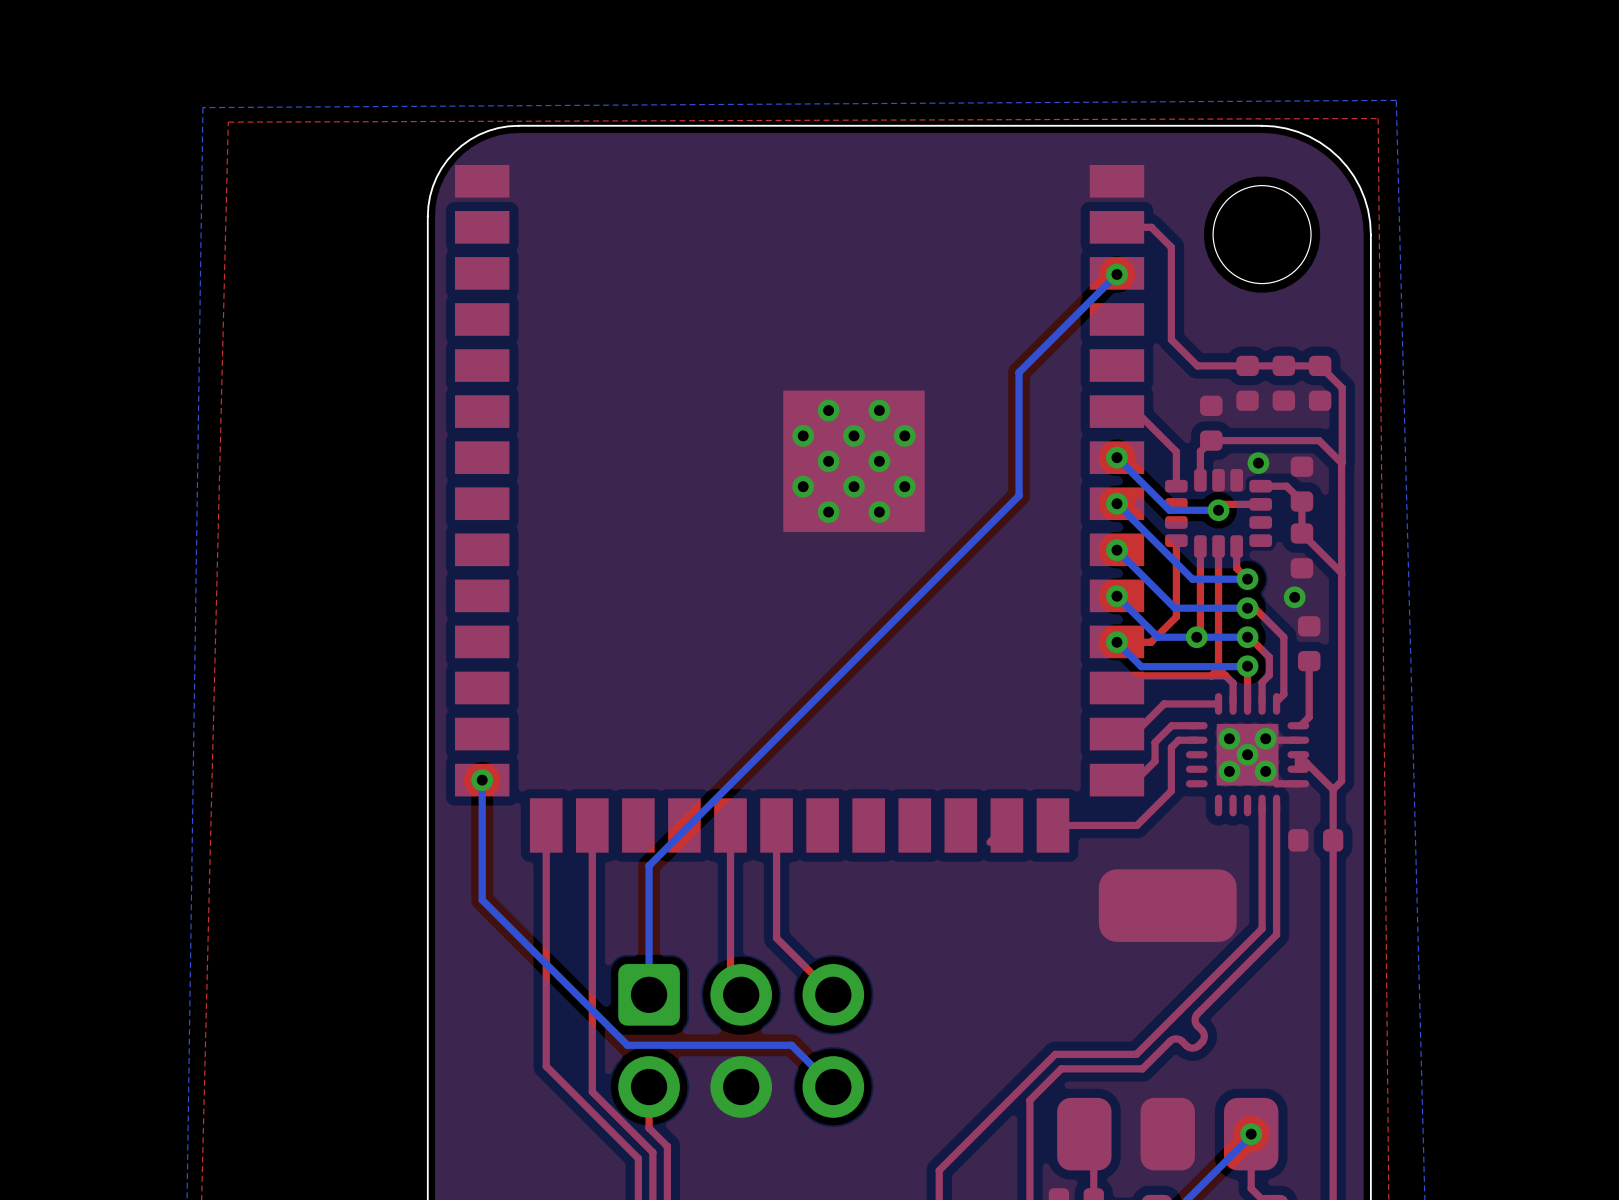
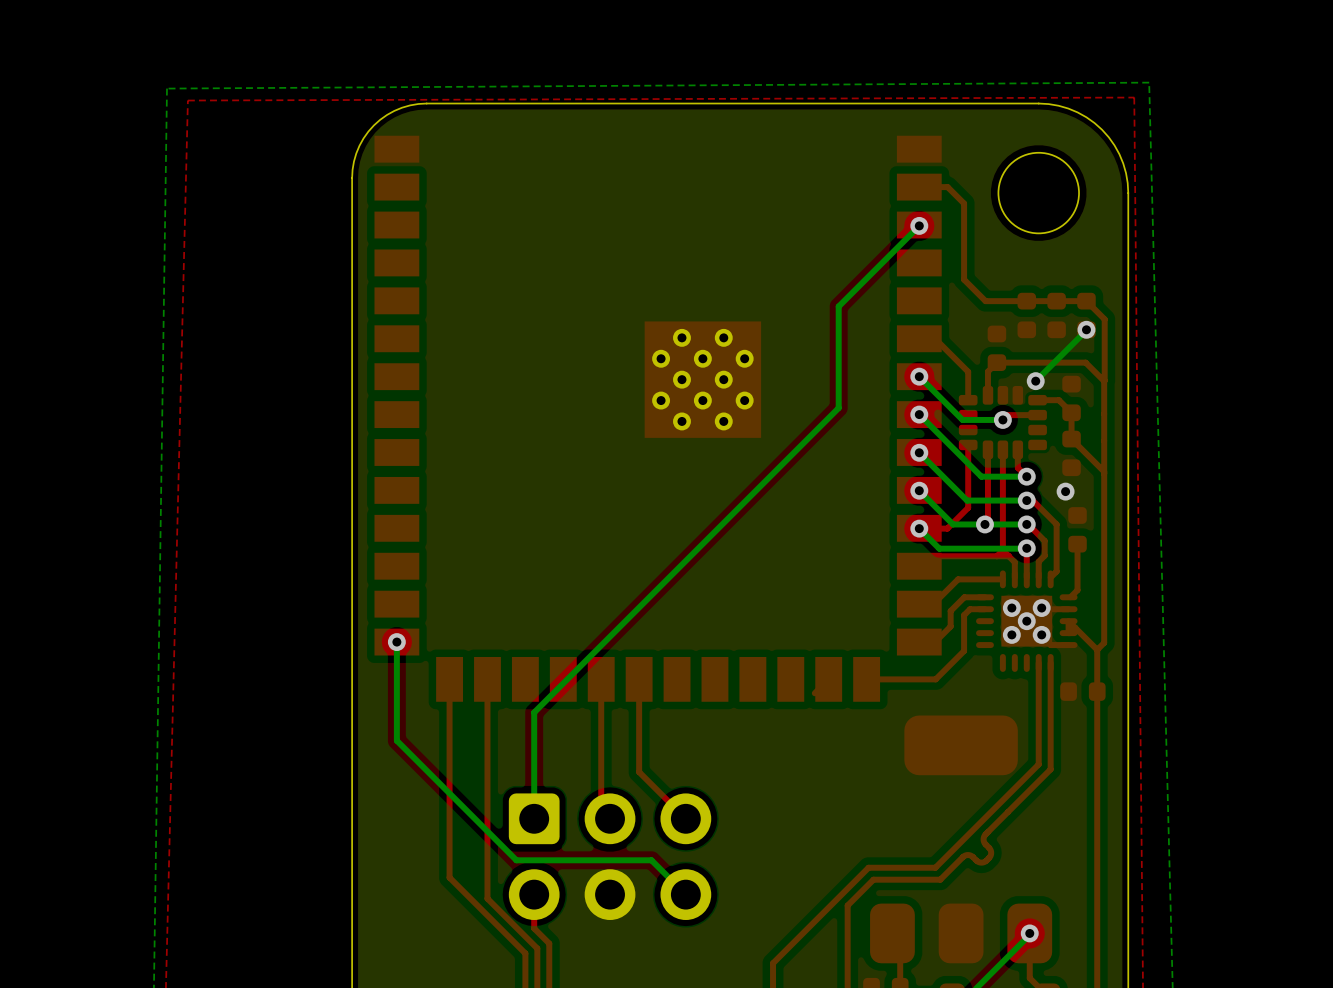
bottom track: none -> (1086, 329) (1035, 381)
via: none -> (1086, 329)

